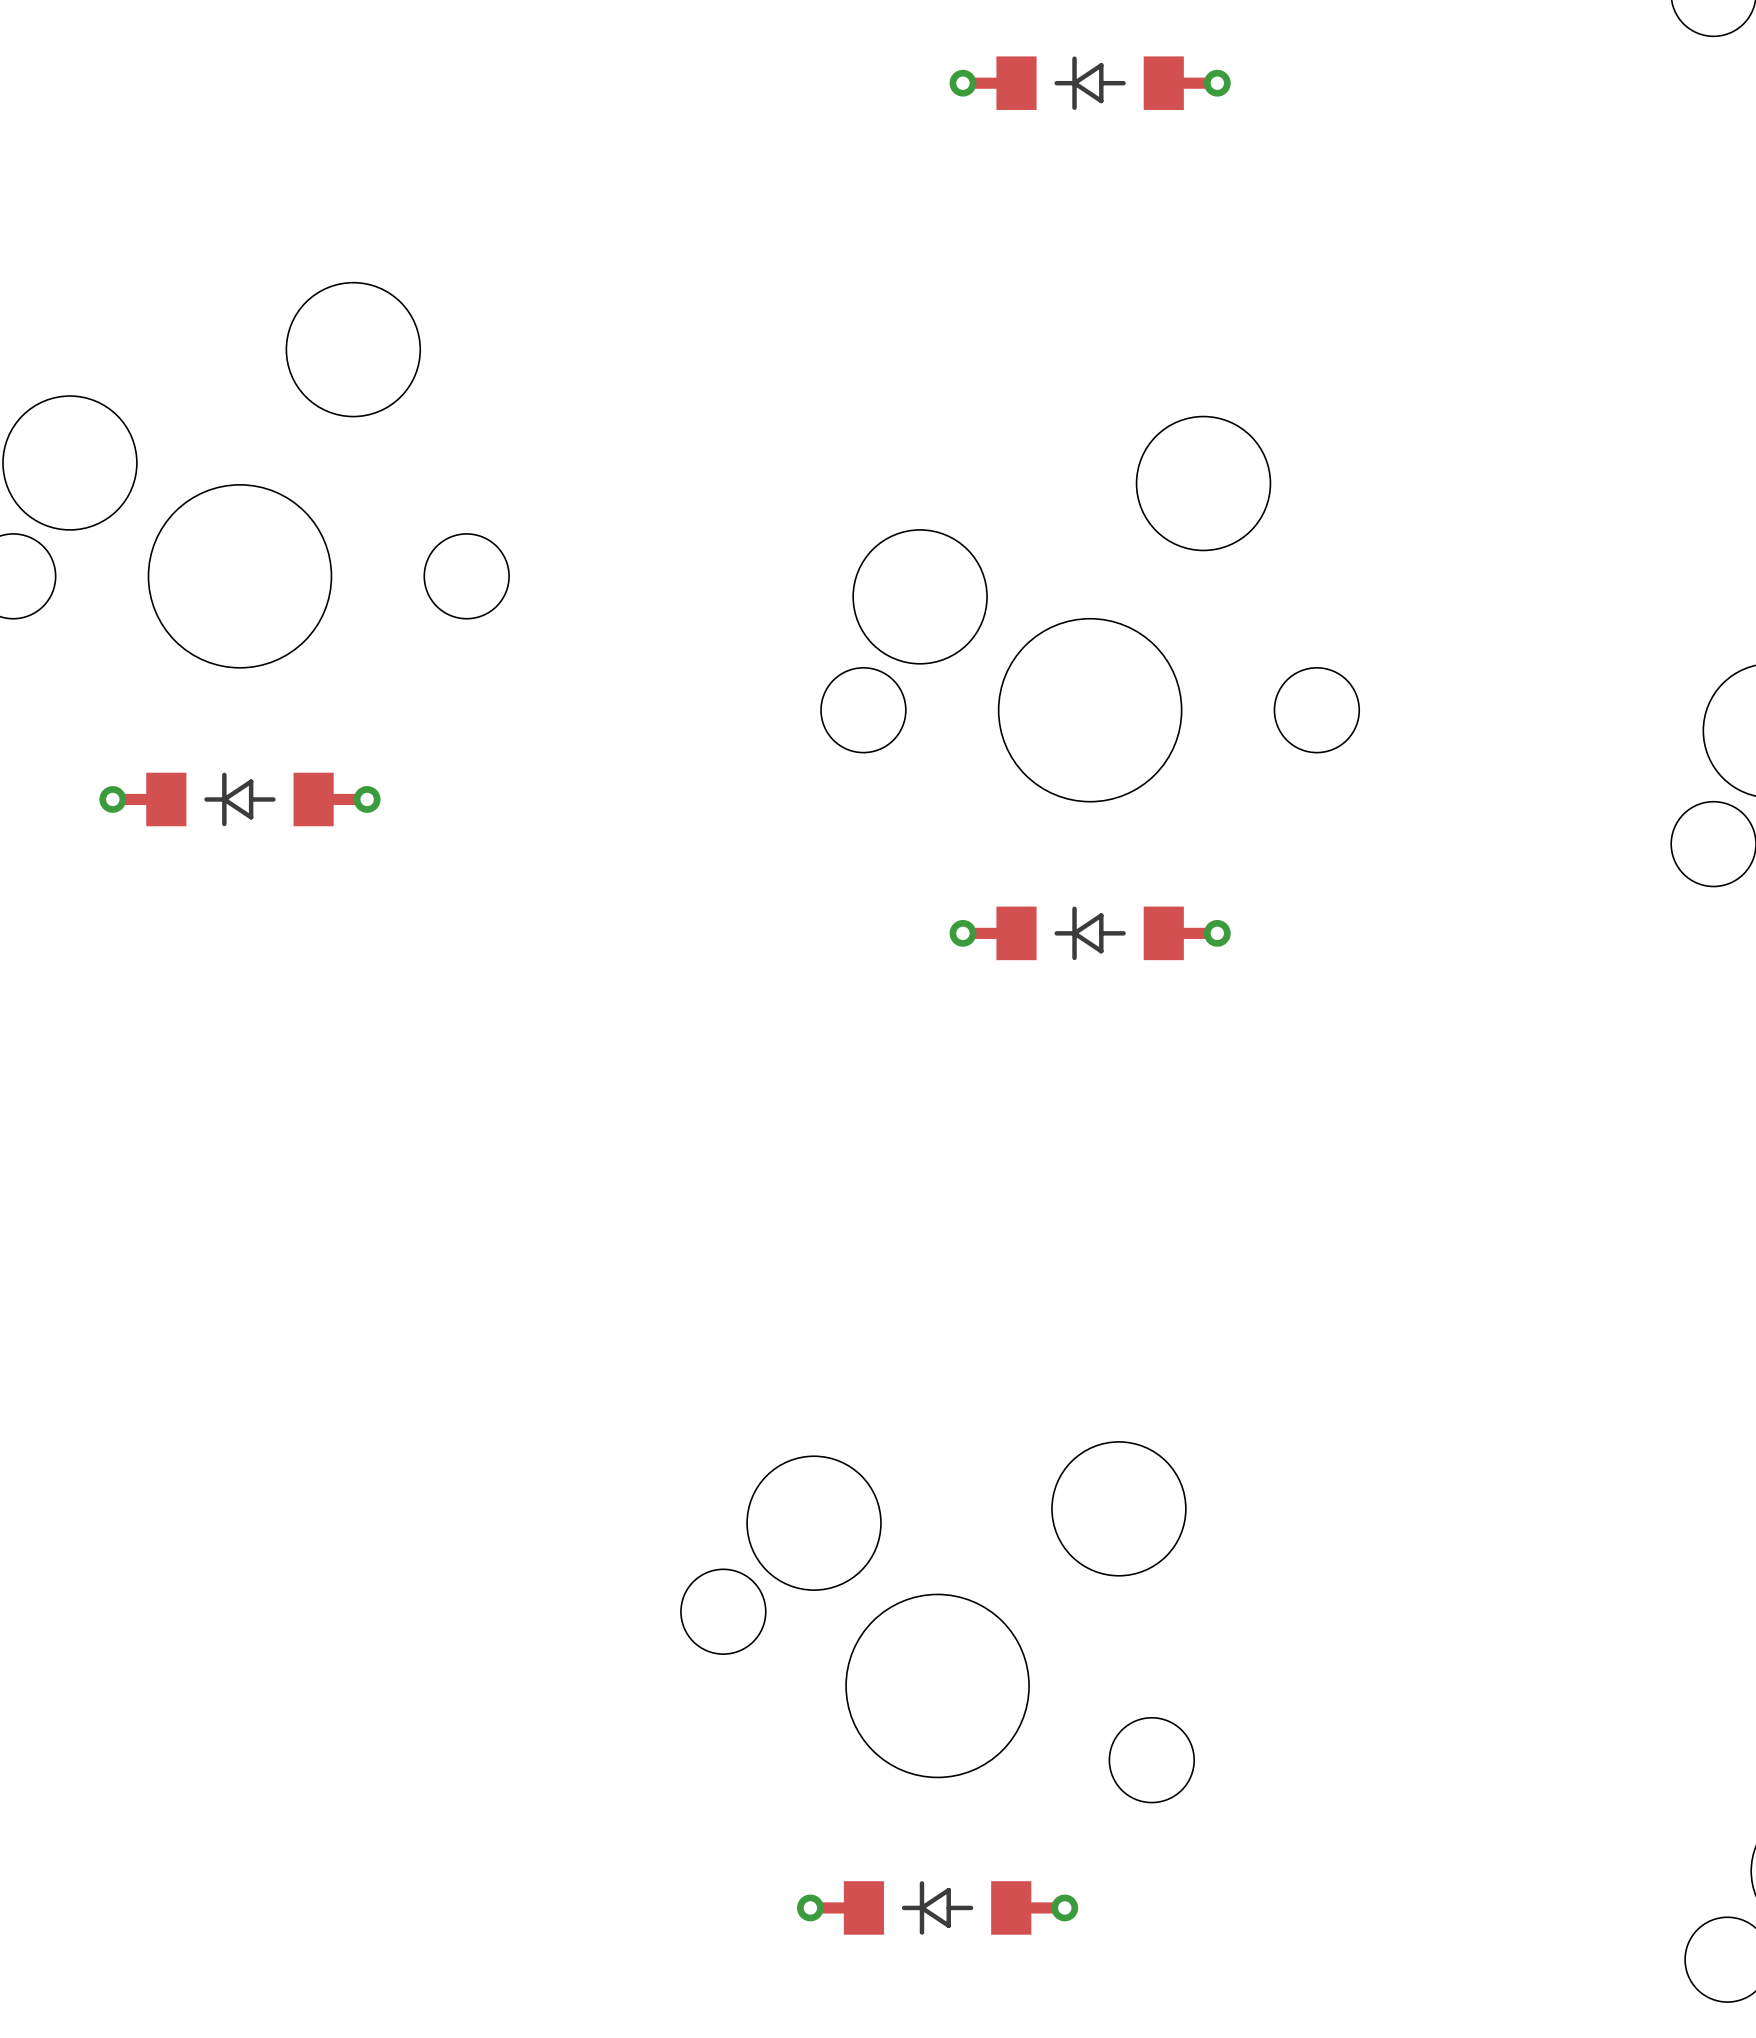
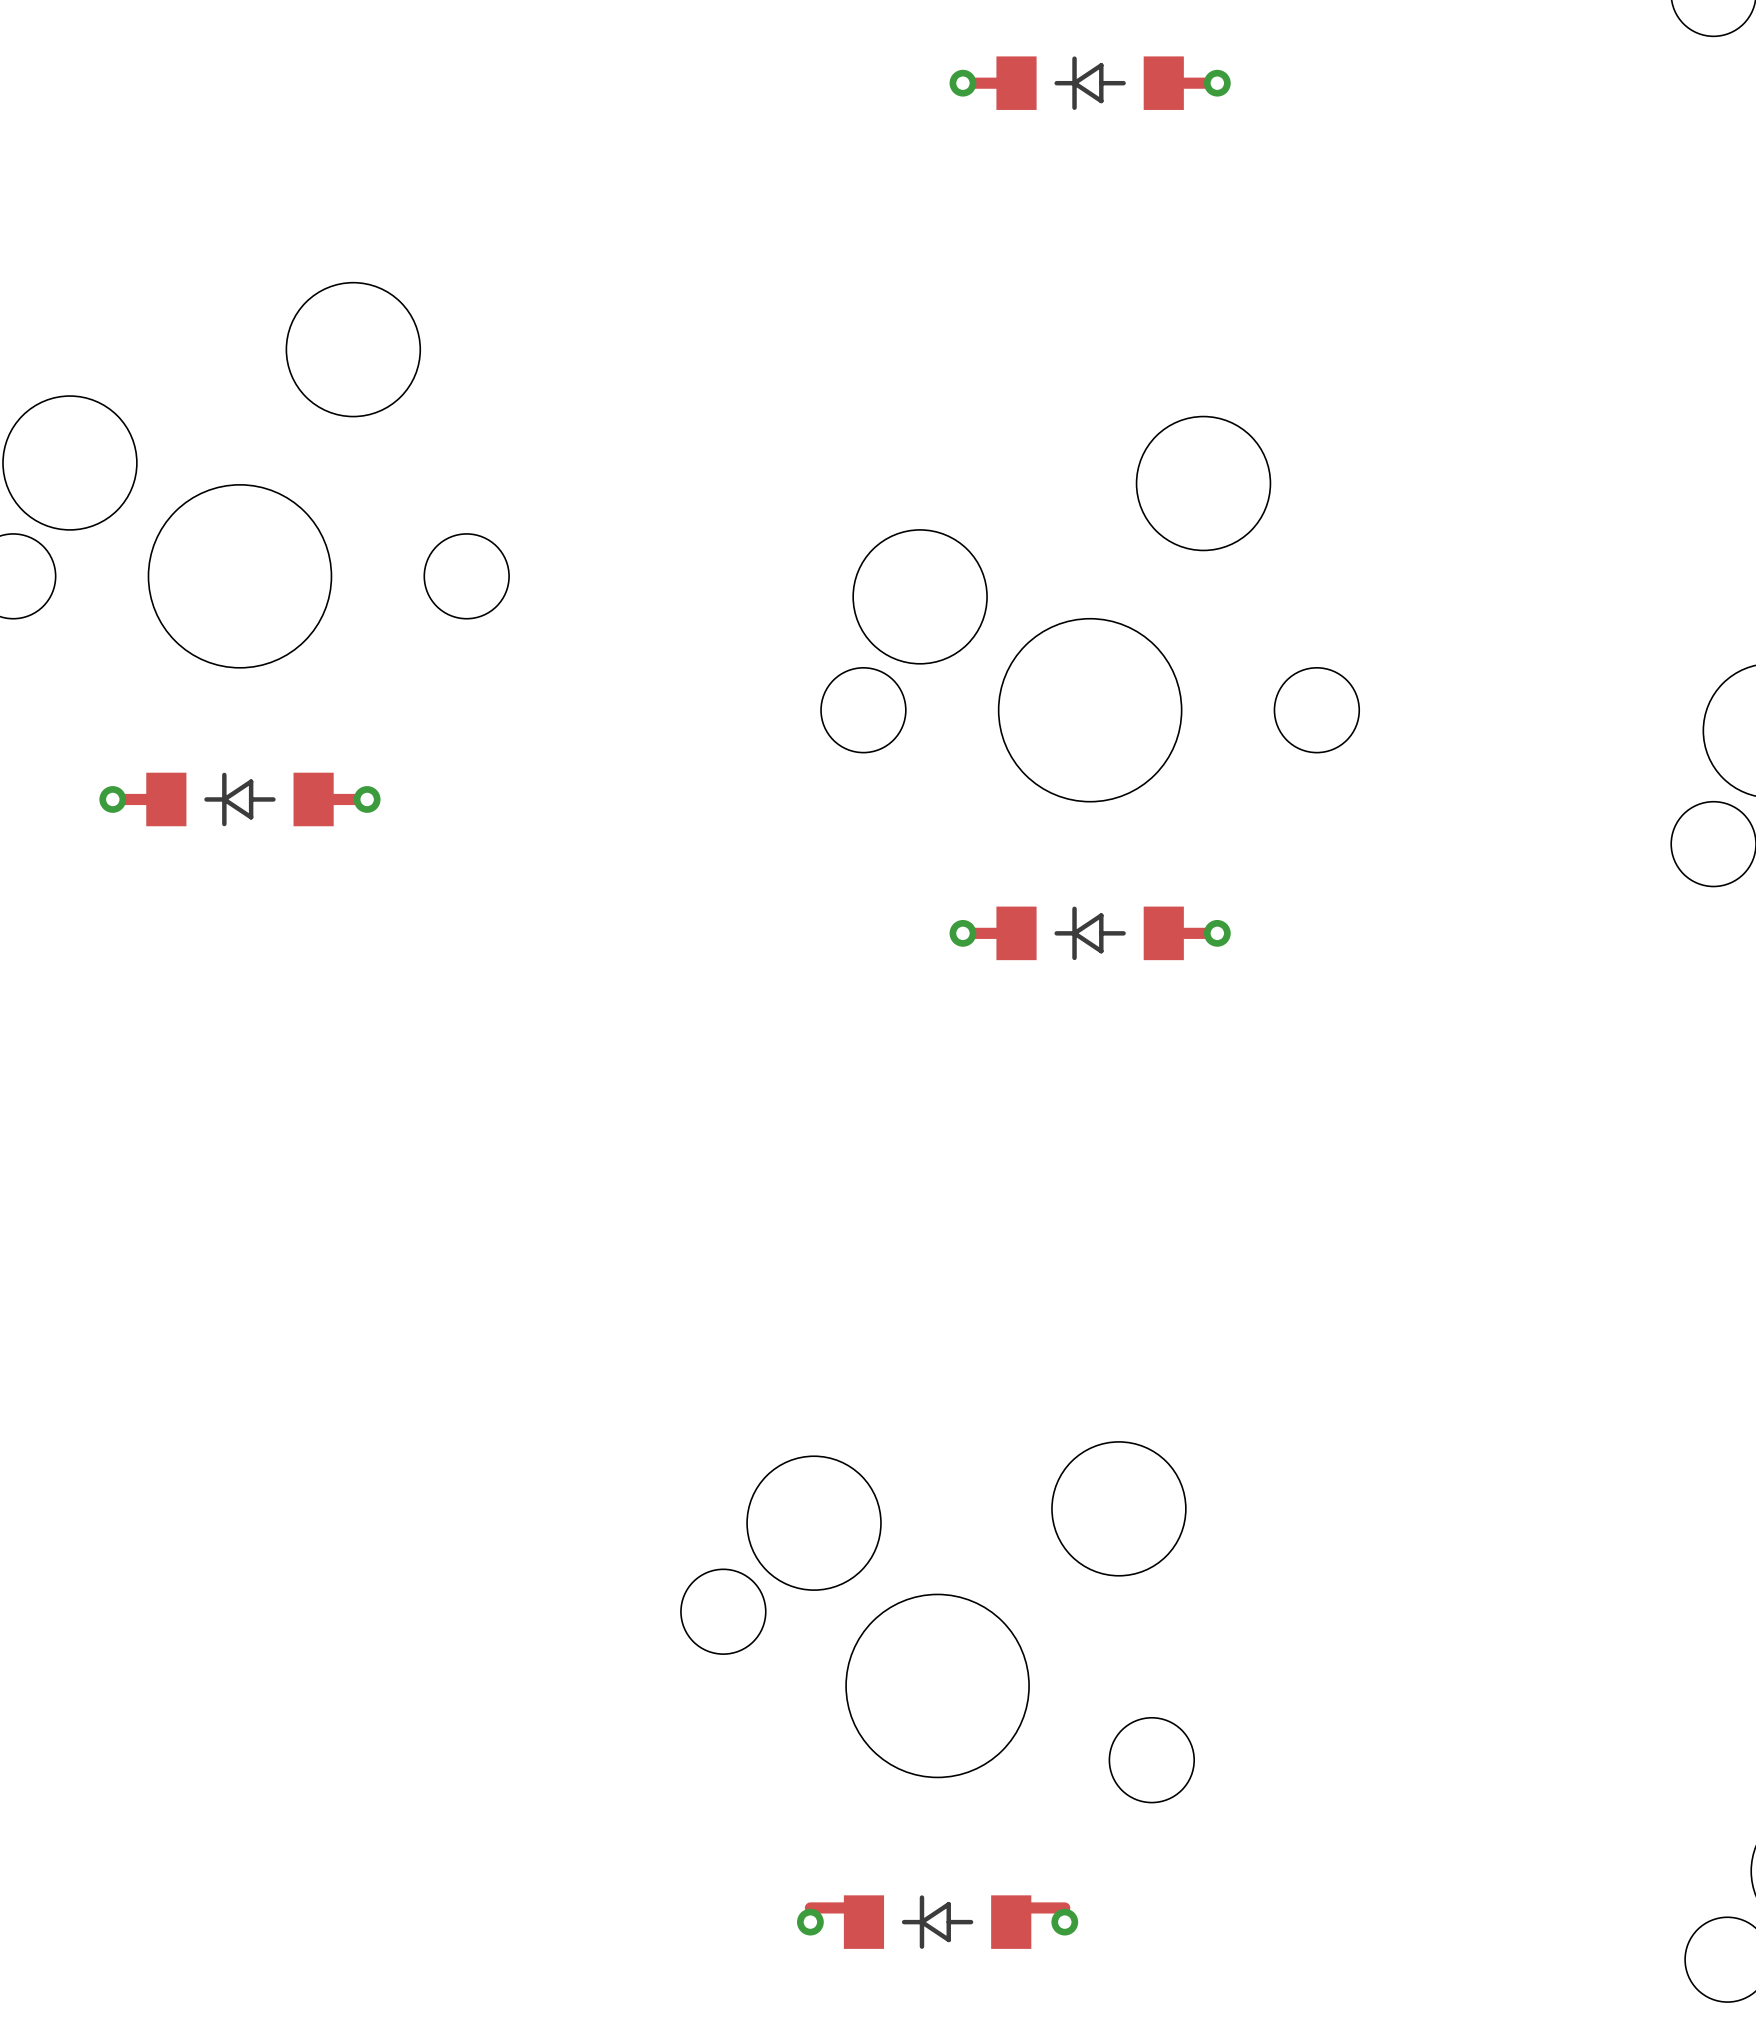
via position: (810, 1907) -> (810, 1922)
part position: (937, 1907) -> (937, 1922)
via position: (1064, 1907) -> (1064, 1922)

